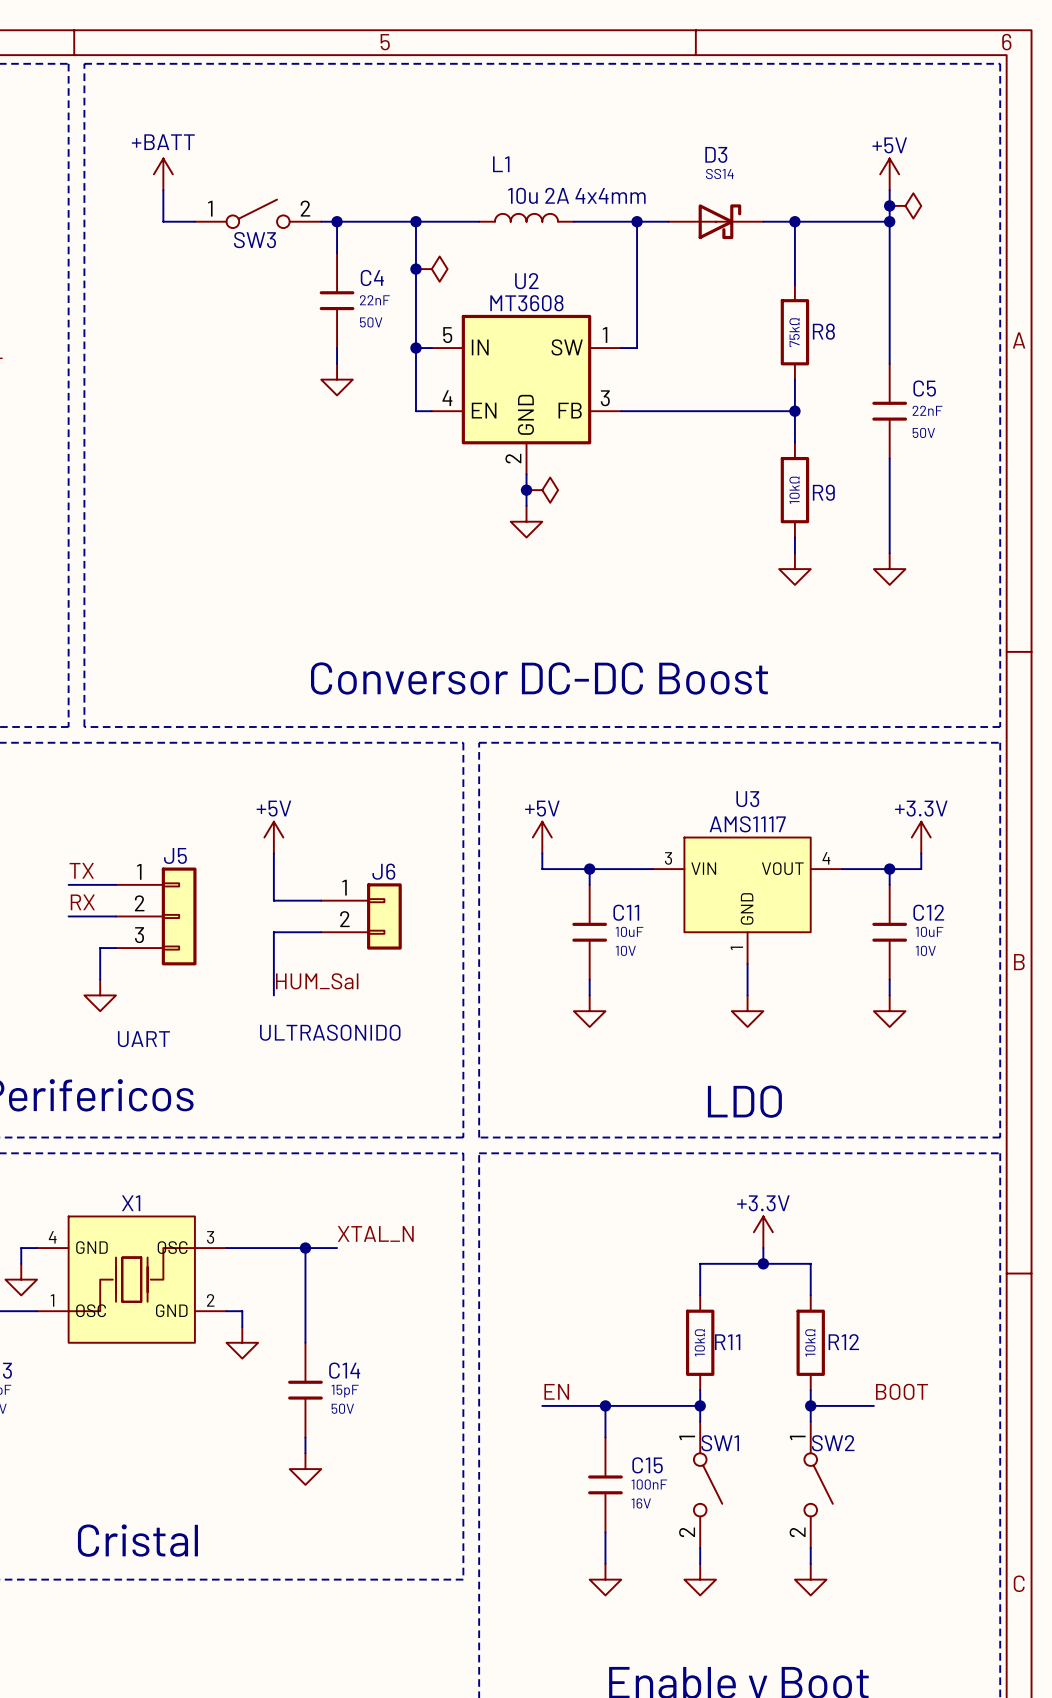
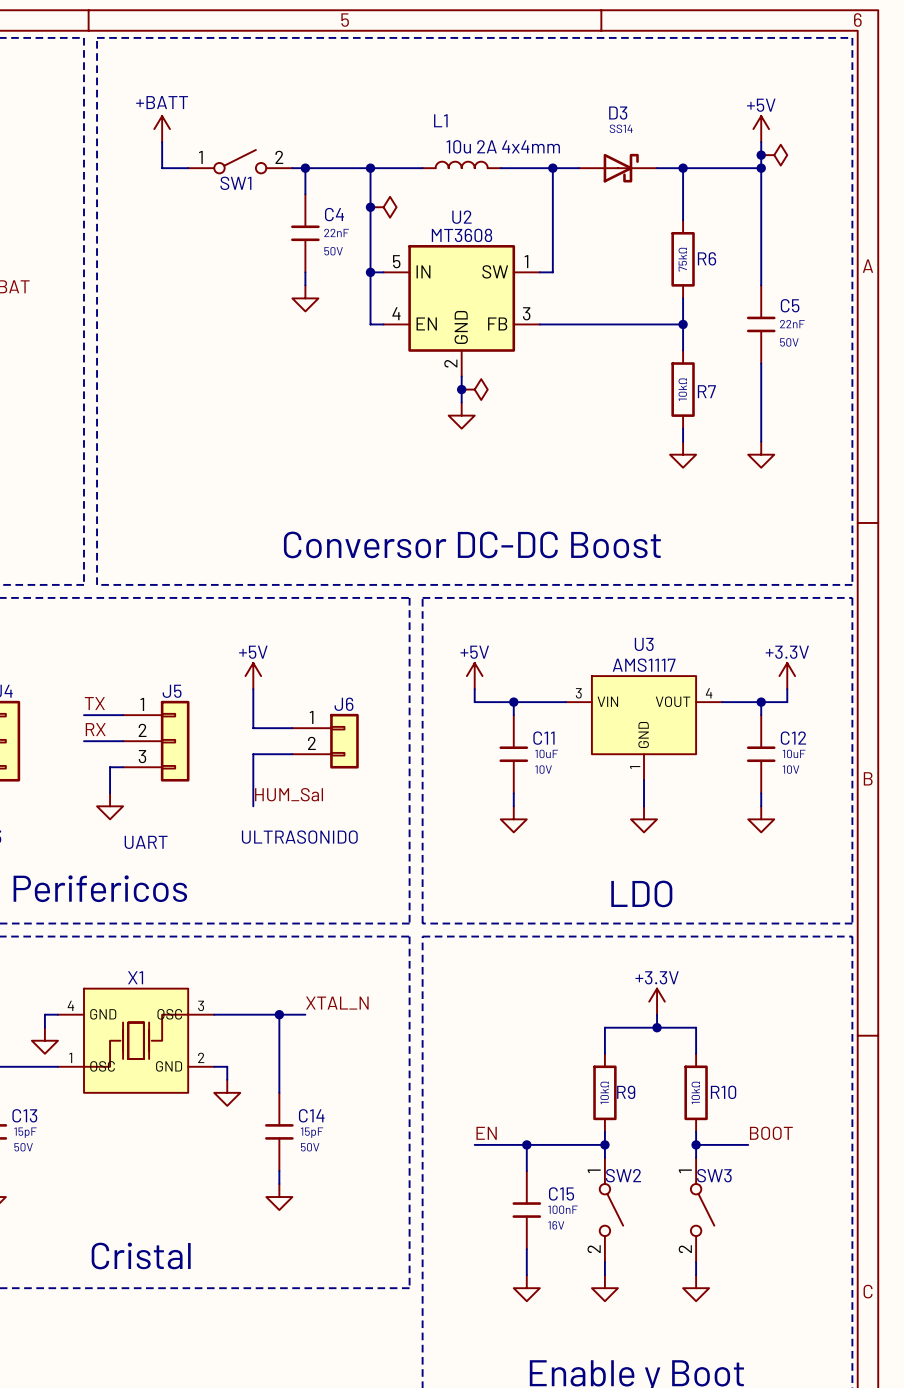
SW3 name: SW3 (254, 240) -> SW1 (235, 183)
R8 name: R8 (823, 331) -> R6 (707, 258)
R9 name: R9 (823, 492) -> R7 (706, 391)
R11 name: R11 (727, 1342) -> R9 (626, 1092)
R12 name: R12 (843, 1342) -> R10 (723, 1092)
SW1 name: SW1 (720, 1443) -> SW2 (623, 1175)
SW2 name: SW2 (833, 1443) -> SW3 (714, 1175)

